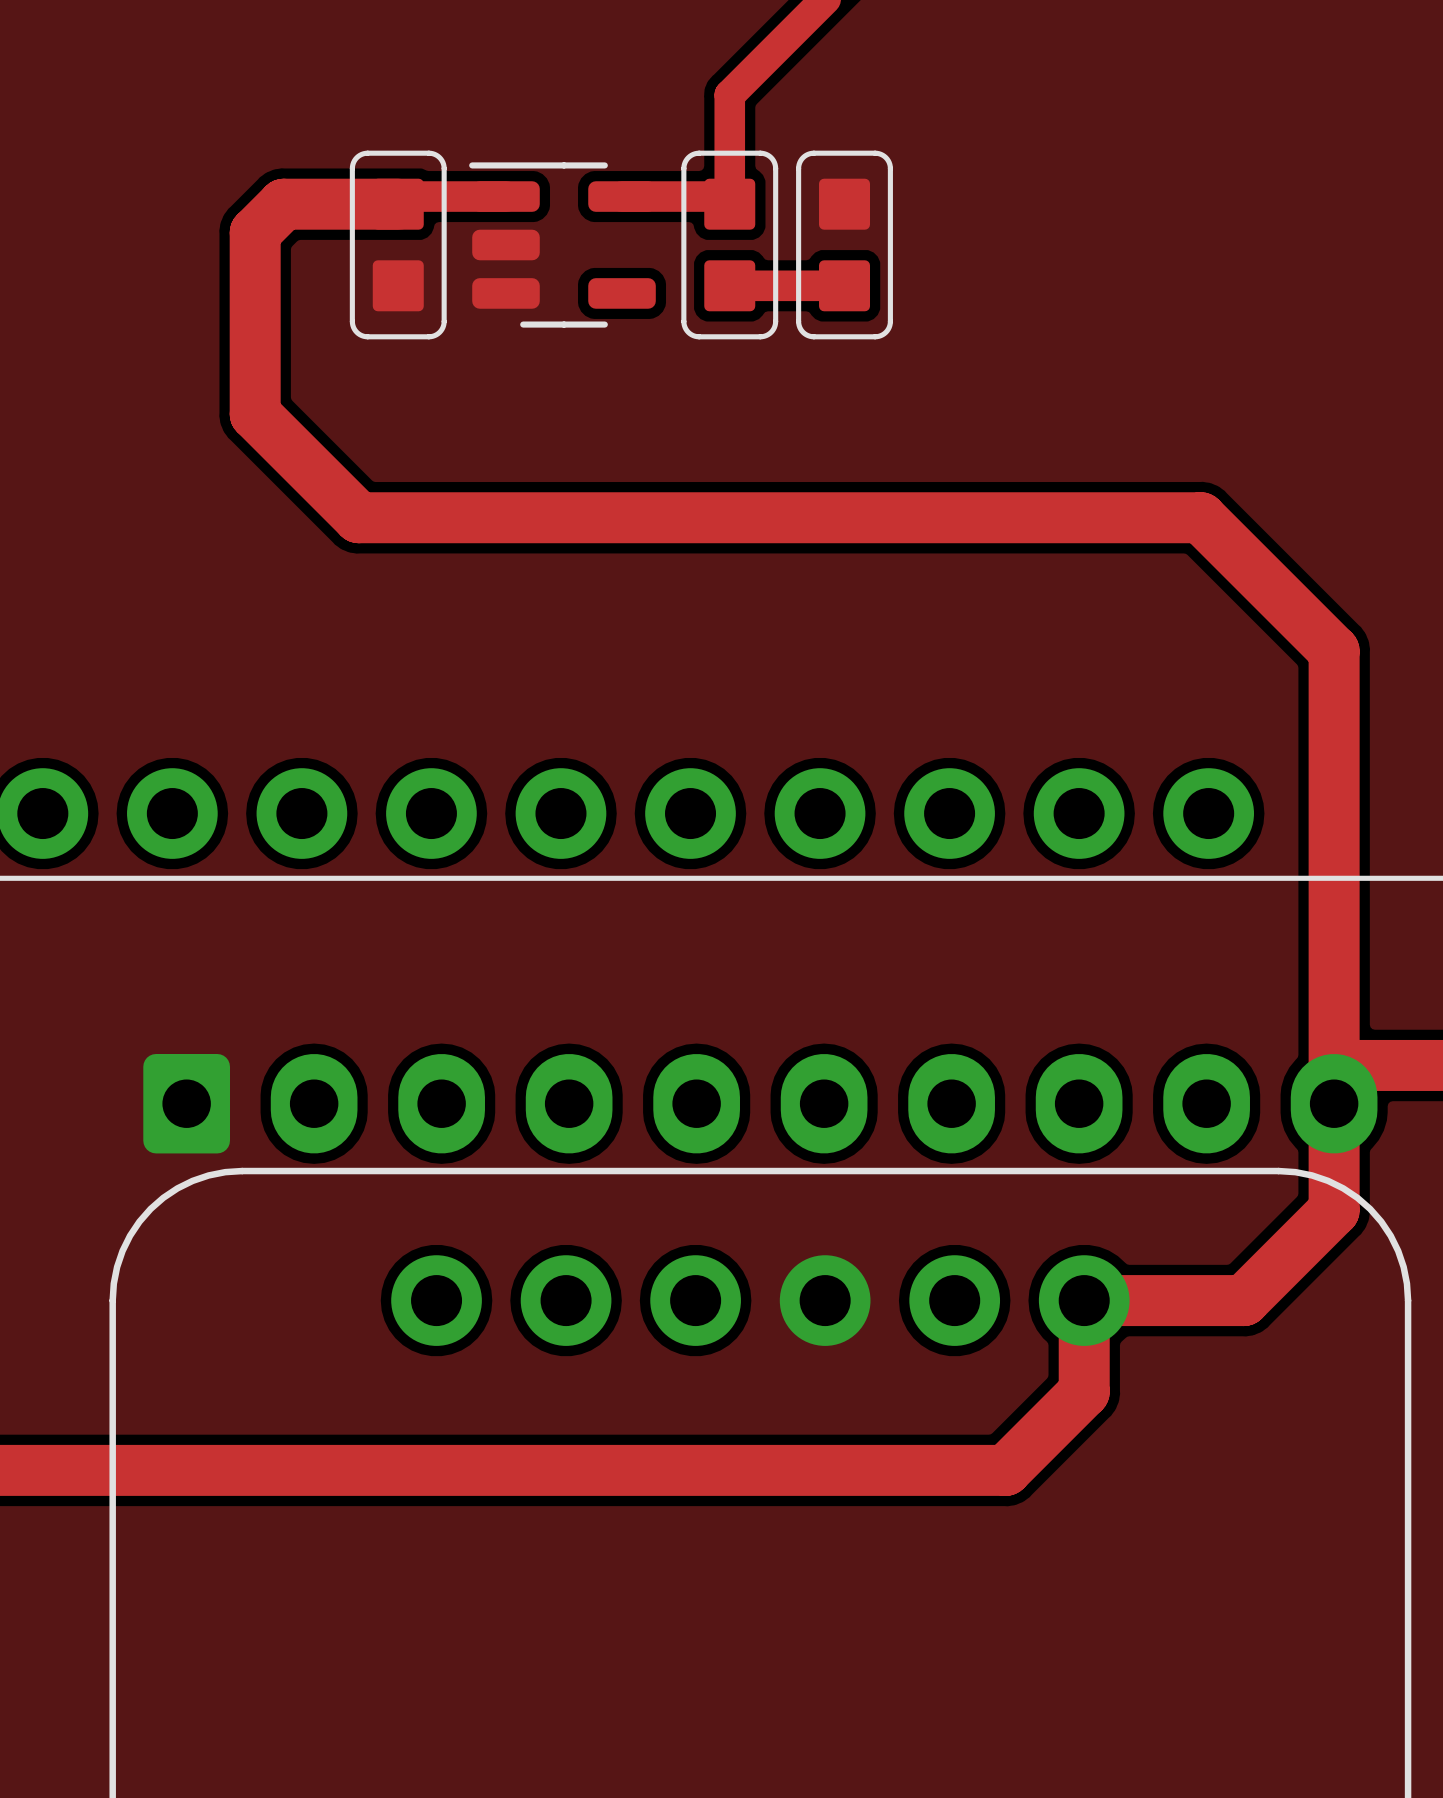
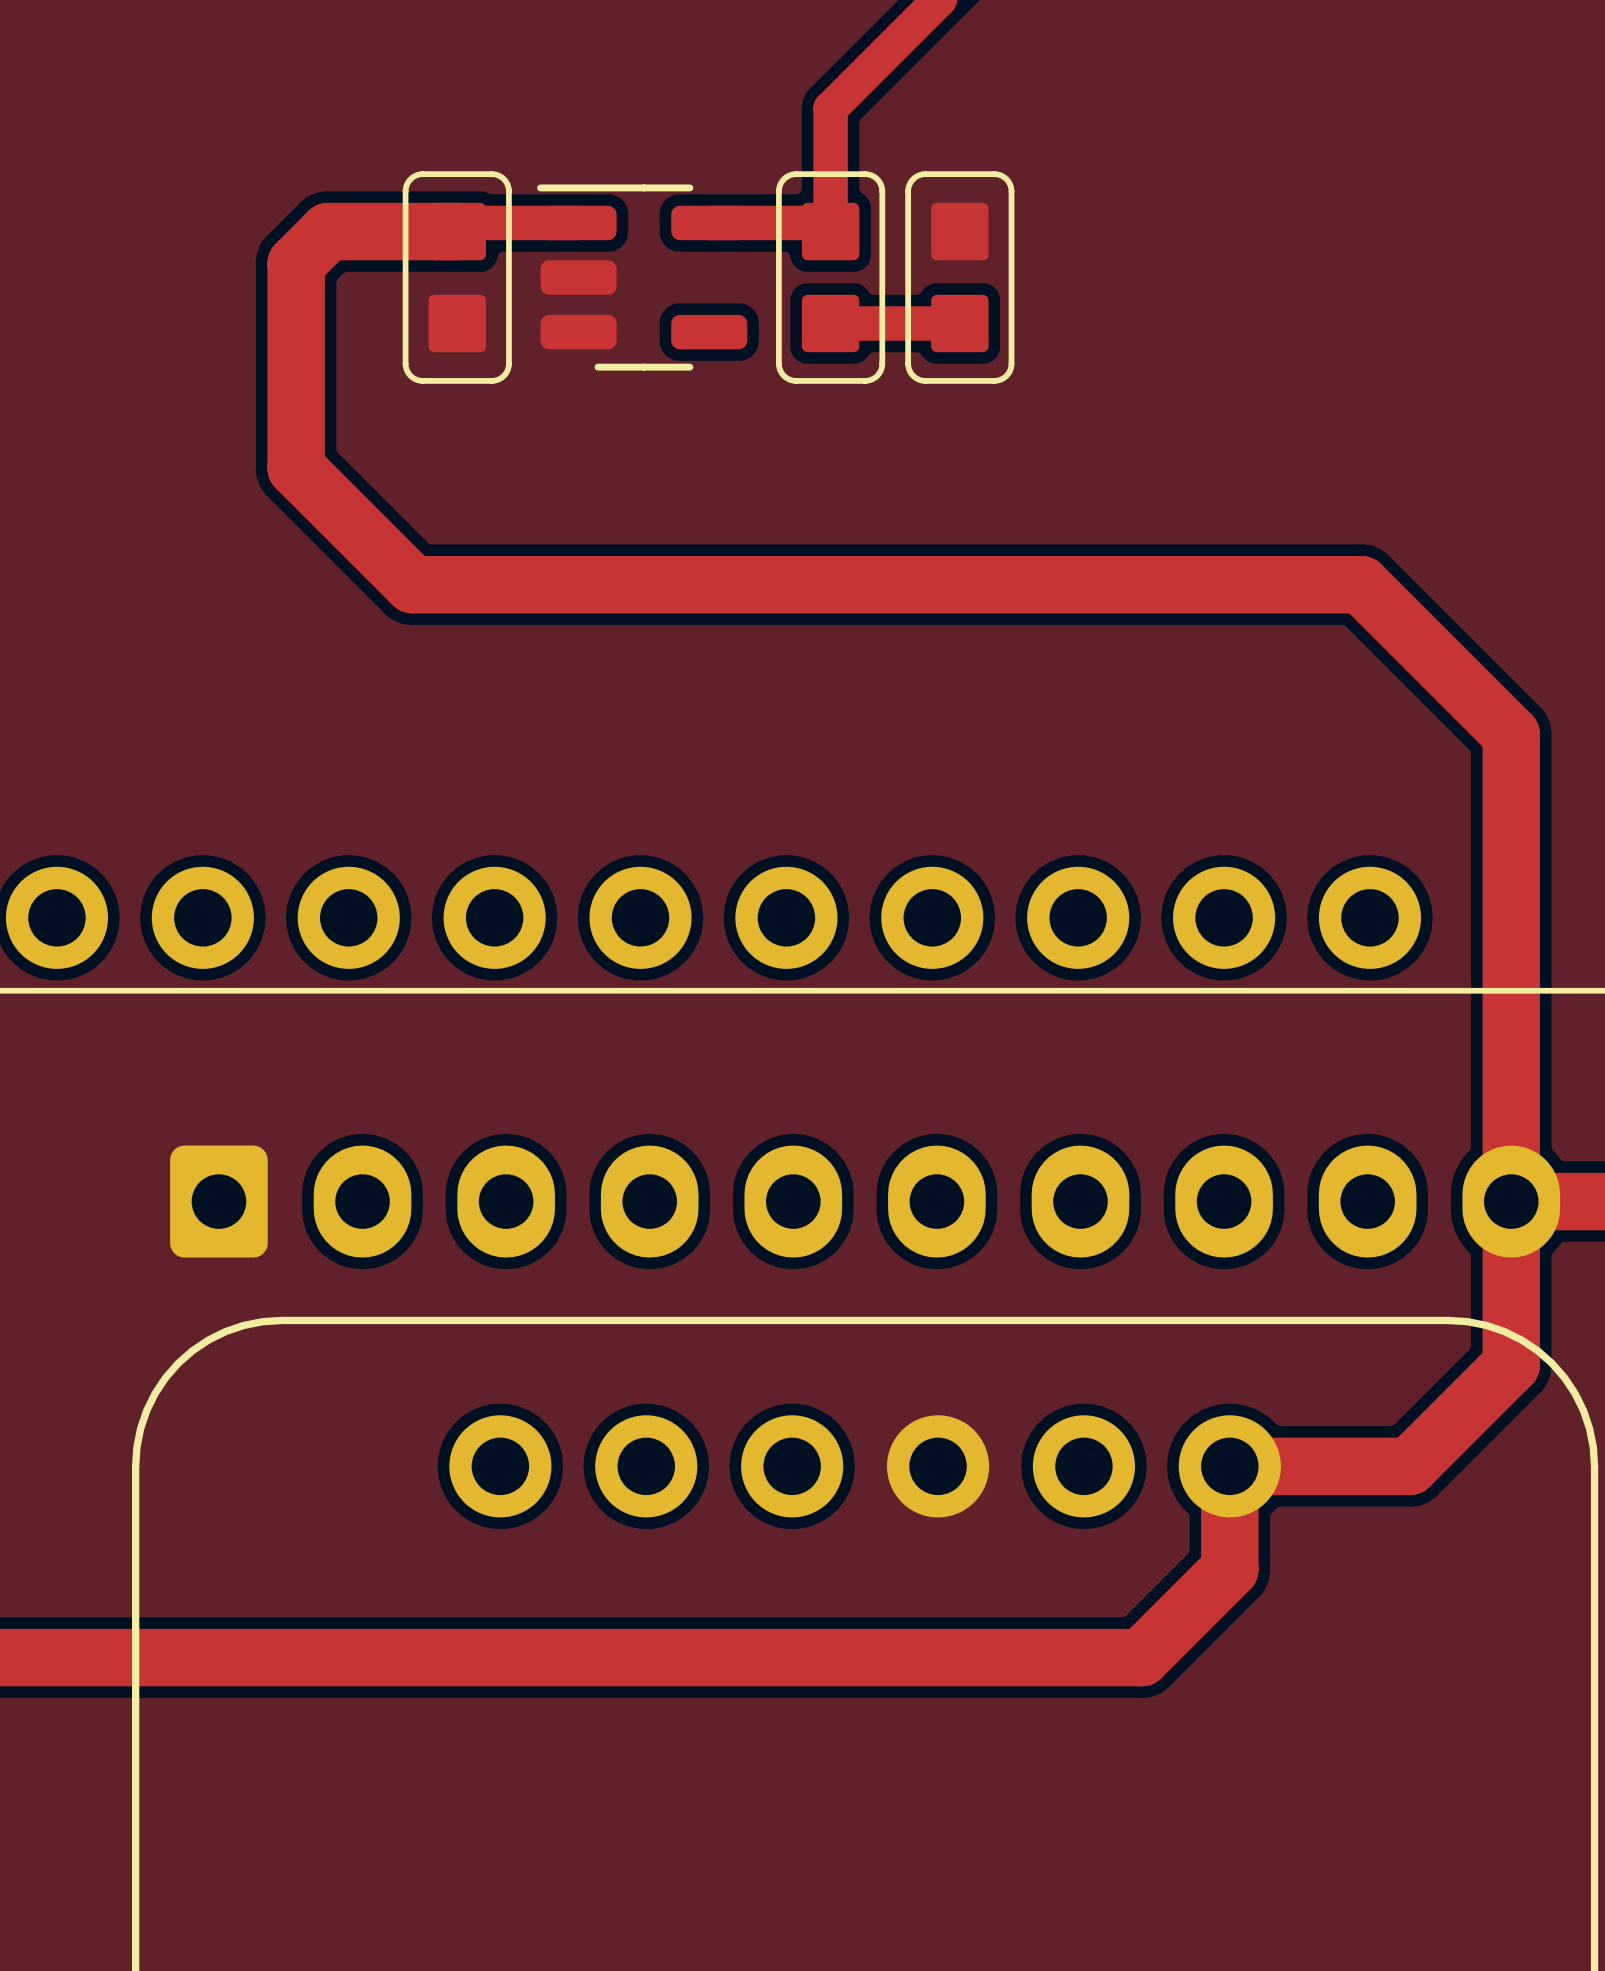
part position: (760, 1103) -> (865, 1201)

